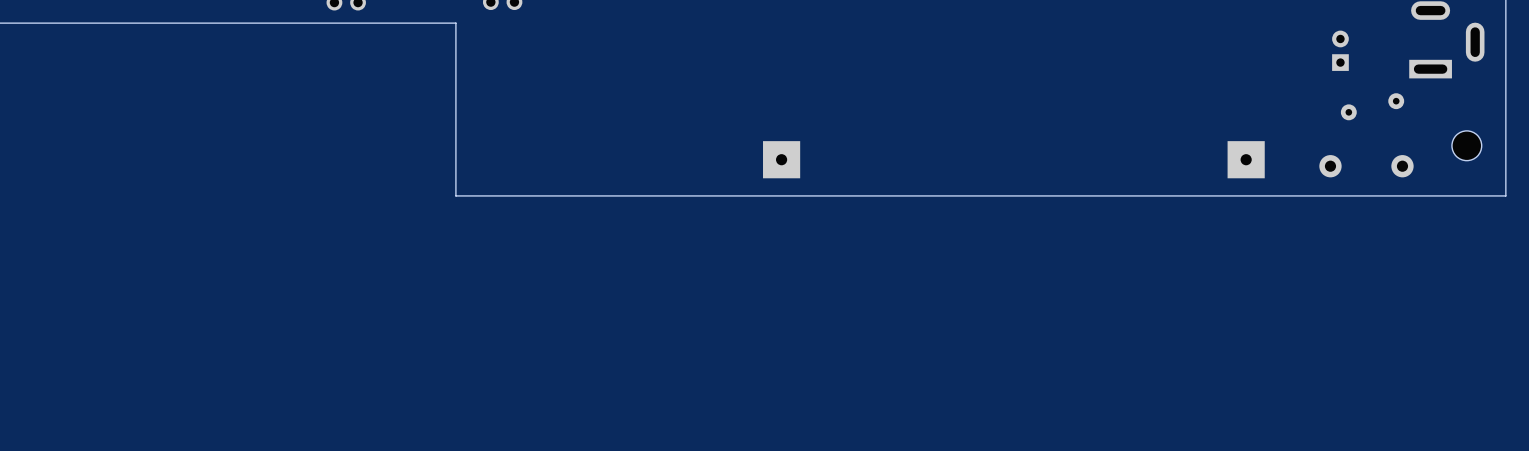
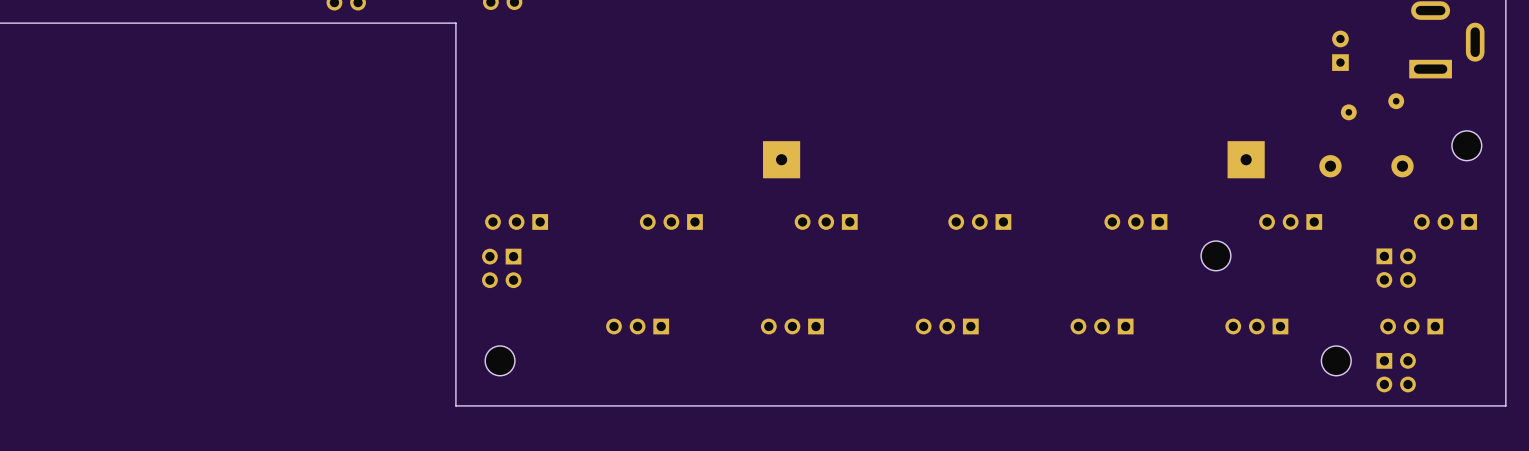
board edge: (1505, 195) (455, 195) -> (1505, 195) (1505, 405) (455, 405) (455, 195)
part: none -> (516, 221)
part: none -> (671, 221)
part: none -> (826, 221)
part: none -> (979, 221)
part: none -> (1135, 221)
part: none -> (1290, 221)
part: none -> (1445, 221)
part: none -> (1215, 255)
part: none -> (501, 268)
part: none -> (1396, 268)
part: none -> (637, 326)
part: none -> (792, 326)
part: none -> (947, 326)
part: none -> (1102, 326)
part: none -> (1256, 326)
part: none -> (1411, 326)
part: none -> (500, 360)
part: none -> (1336, 360)
part: none -> (1396, 372)

